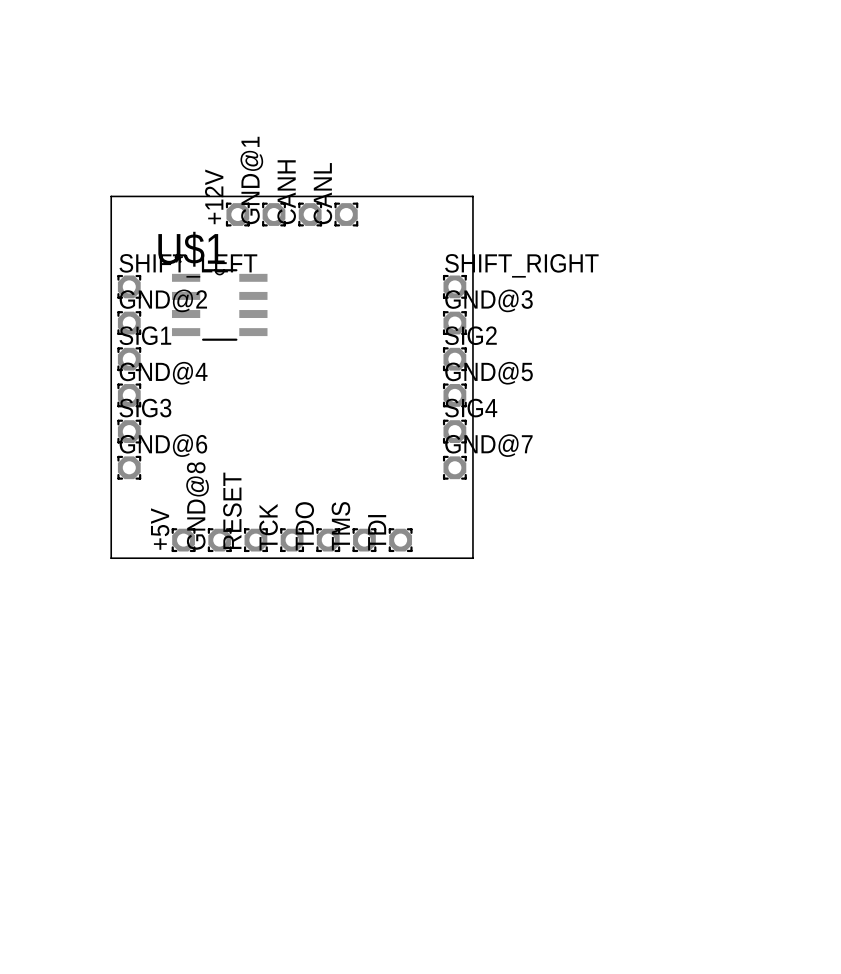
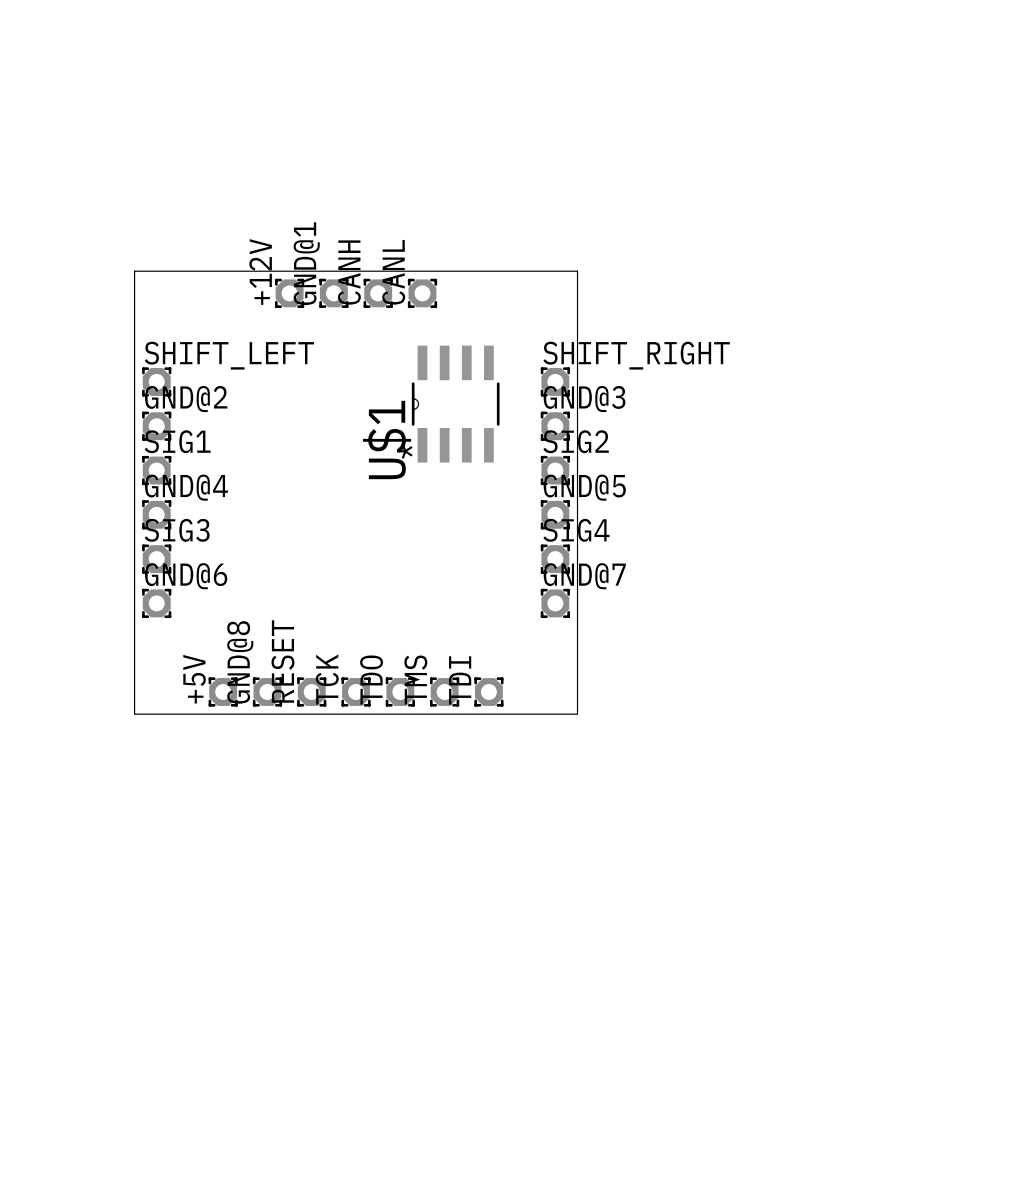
U$1 rotation: 0° (219, 304) -> 90° counterclockwise (455, 404)
U$1 position: (219, 304) -> (455, 404)

